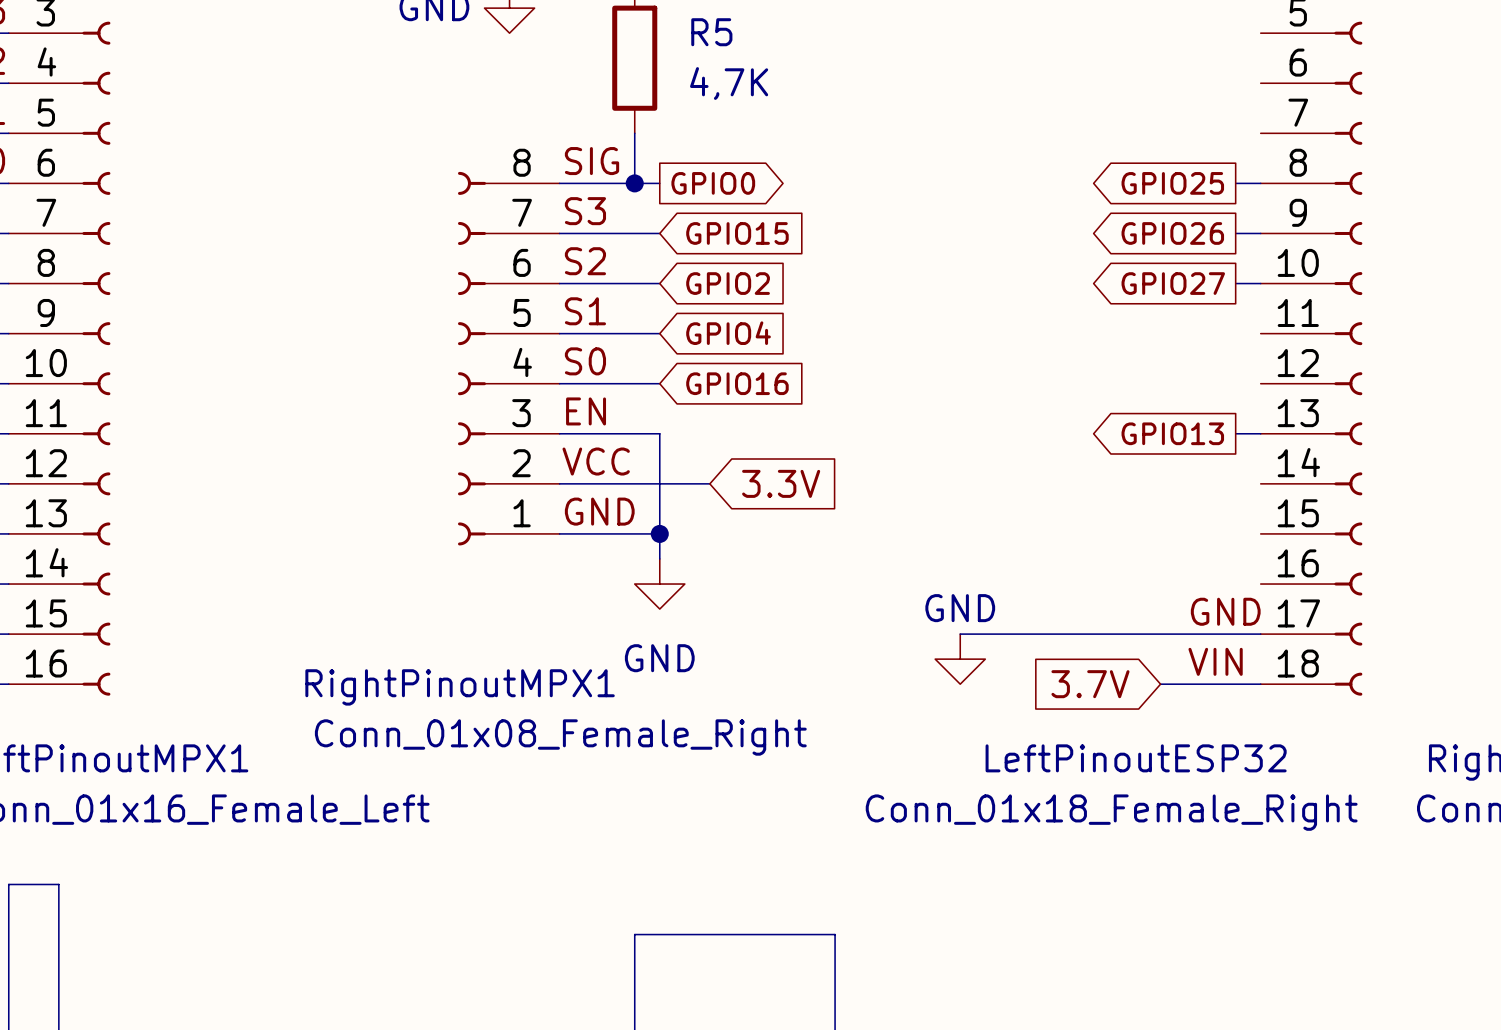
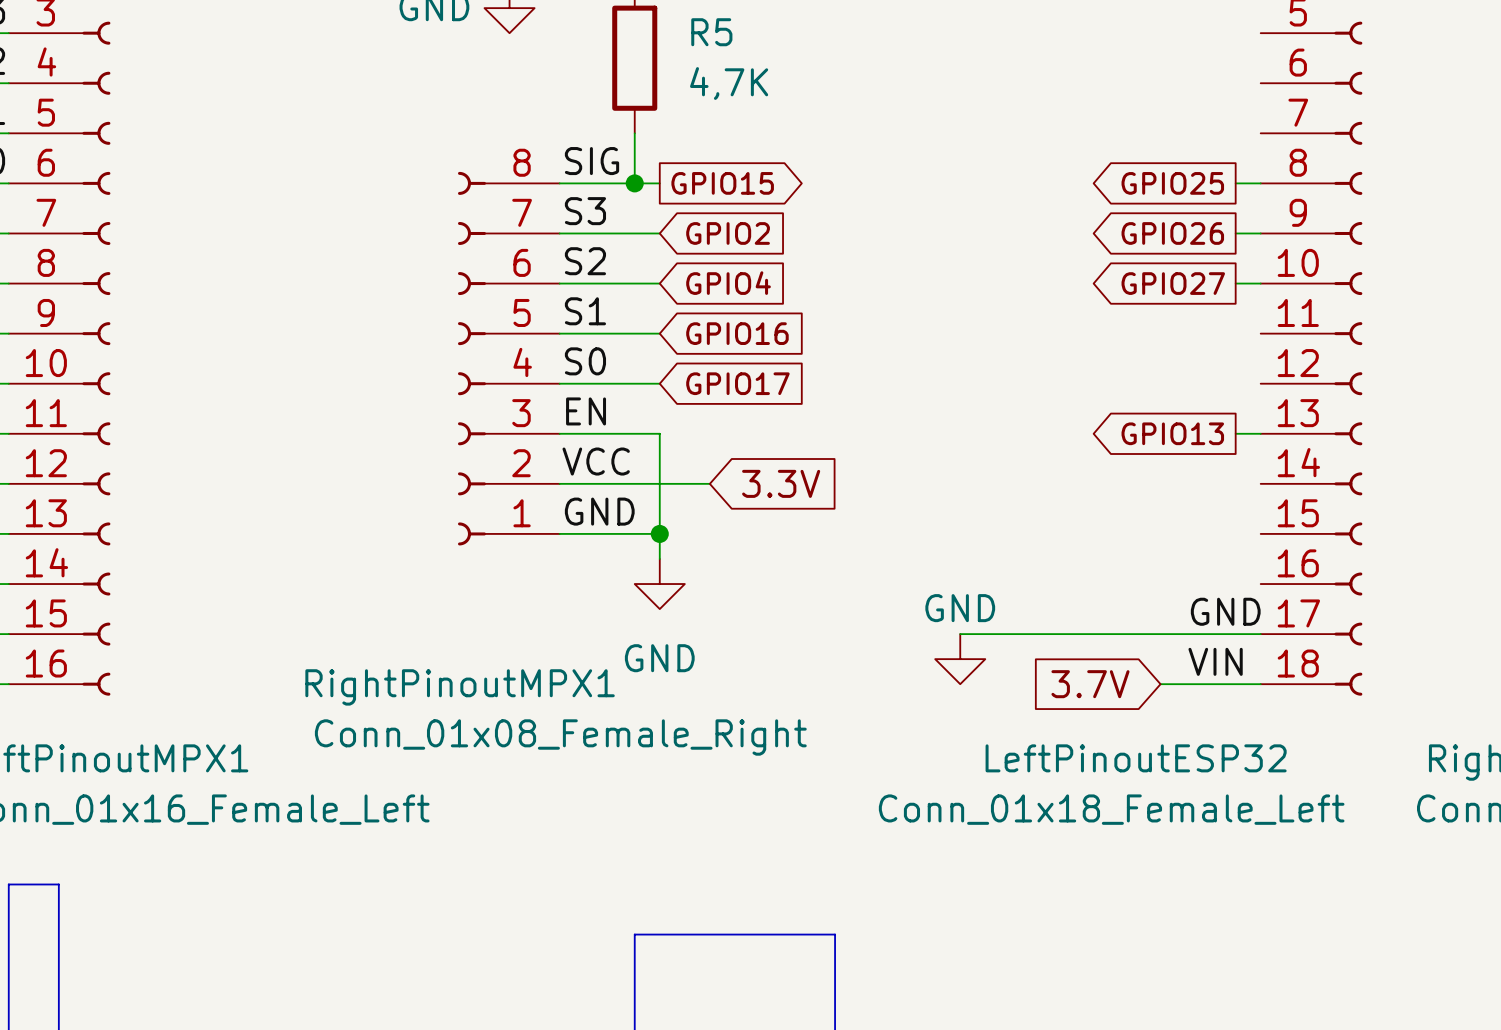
global label: GPIO0 (713, 183) -> GPIO15 (722, 183)
global label: GPIO15 (737, 233) -> GPIO2 (728, 233)
global label: GPIO2 (728, 283) -> GPIO4 (728, 283)
global label: GPIO4 (728, 333) -> GPIO16 (737, 333)
global label: GPIO16 (737, 383) -> GPIO17 (737, 383)
LeftPinoutESP32 value: Conn_01x18_Female_Right (1111, 812) -> Conn_01x18_Female_Left (1111, 809)

